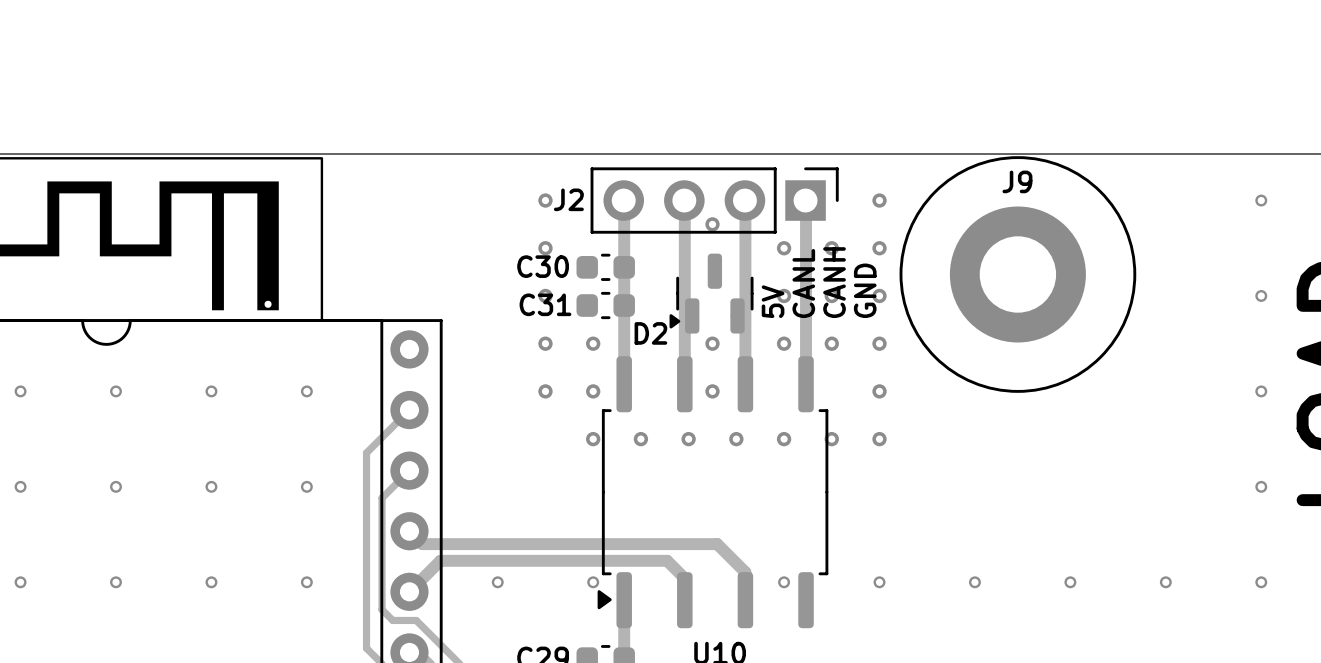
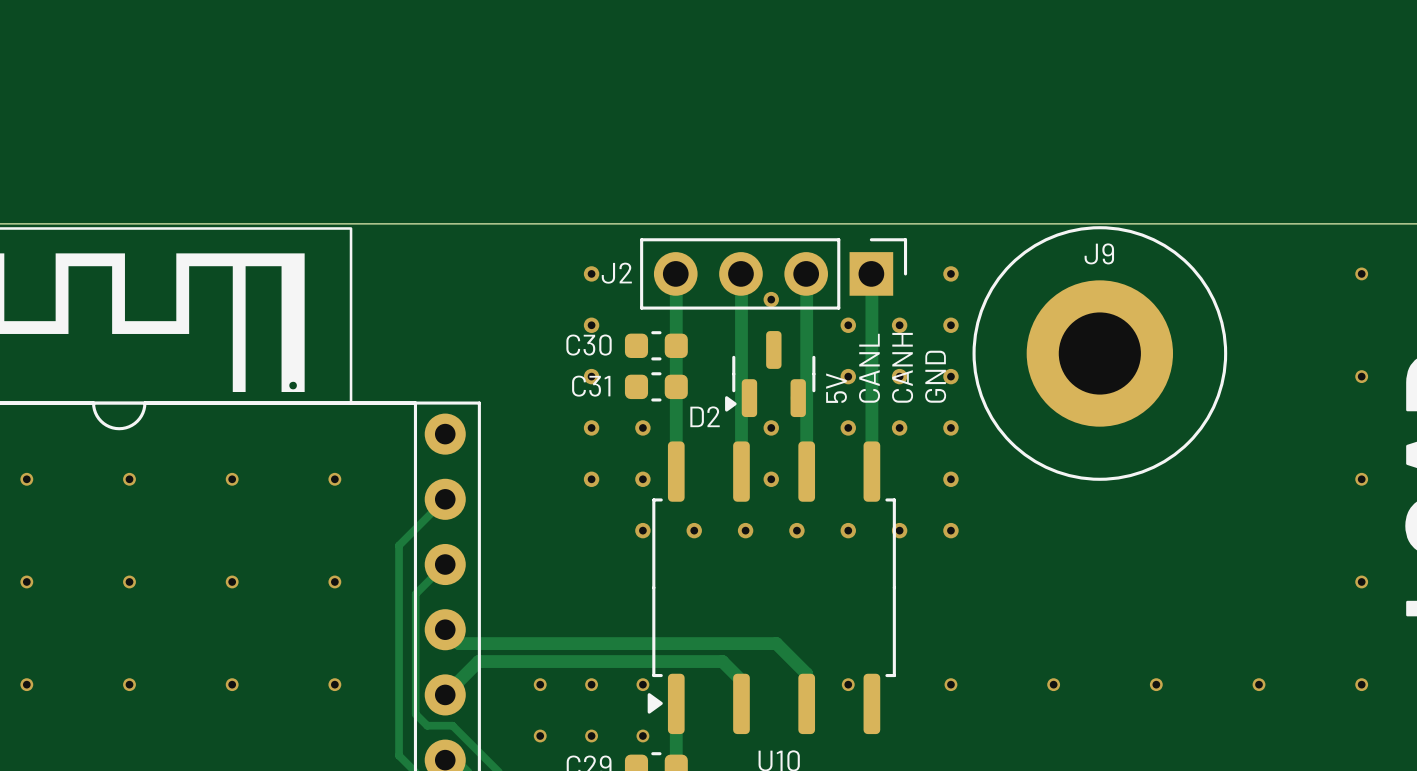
via: none -> (591, 684)
via: none -> (540, 735)
via: none -> (591, 735)
via: none -> (642, 735)

